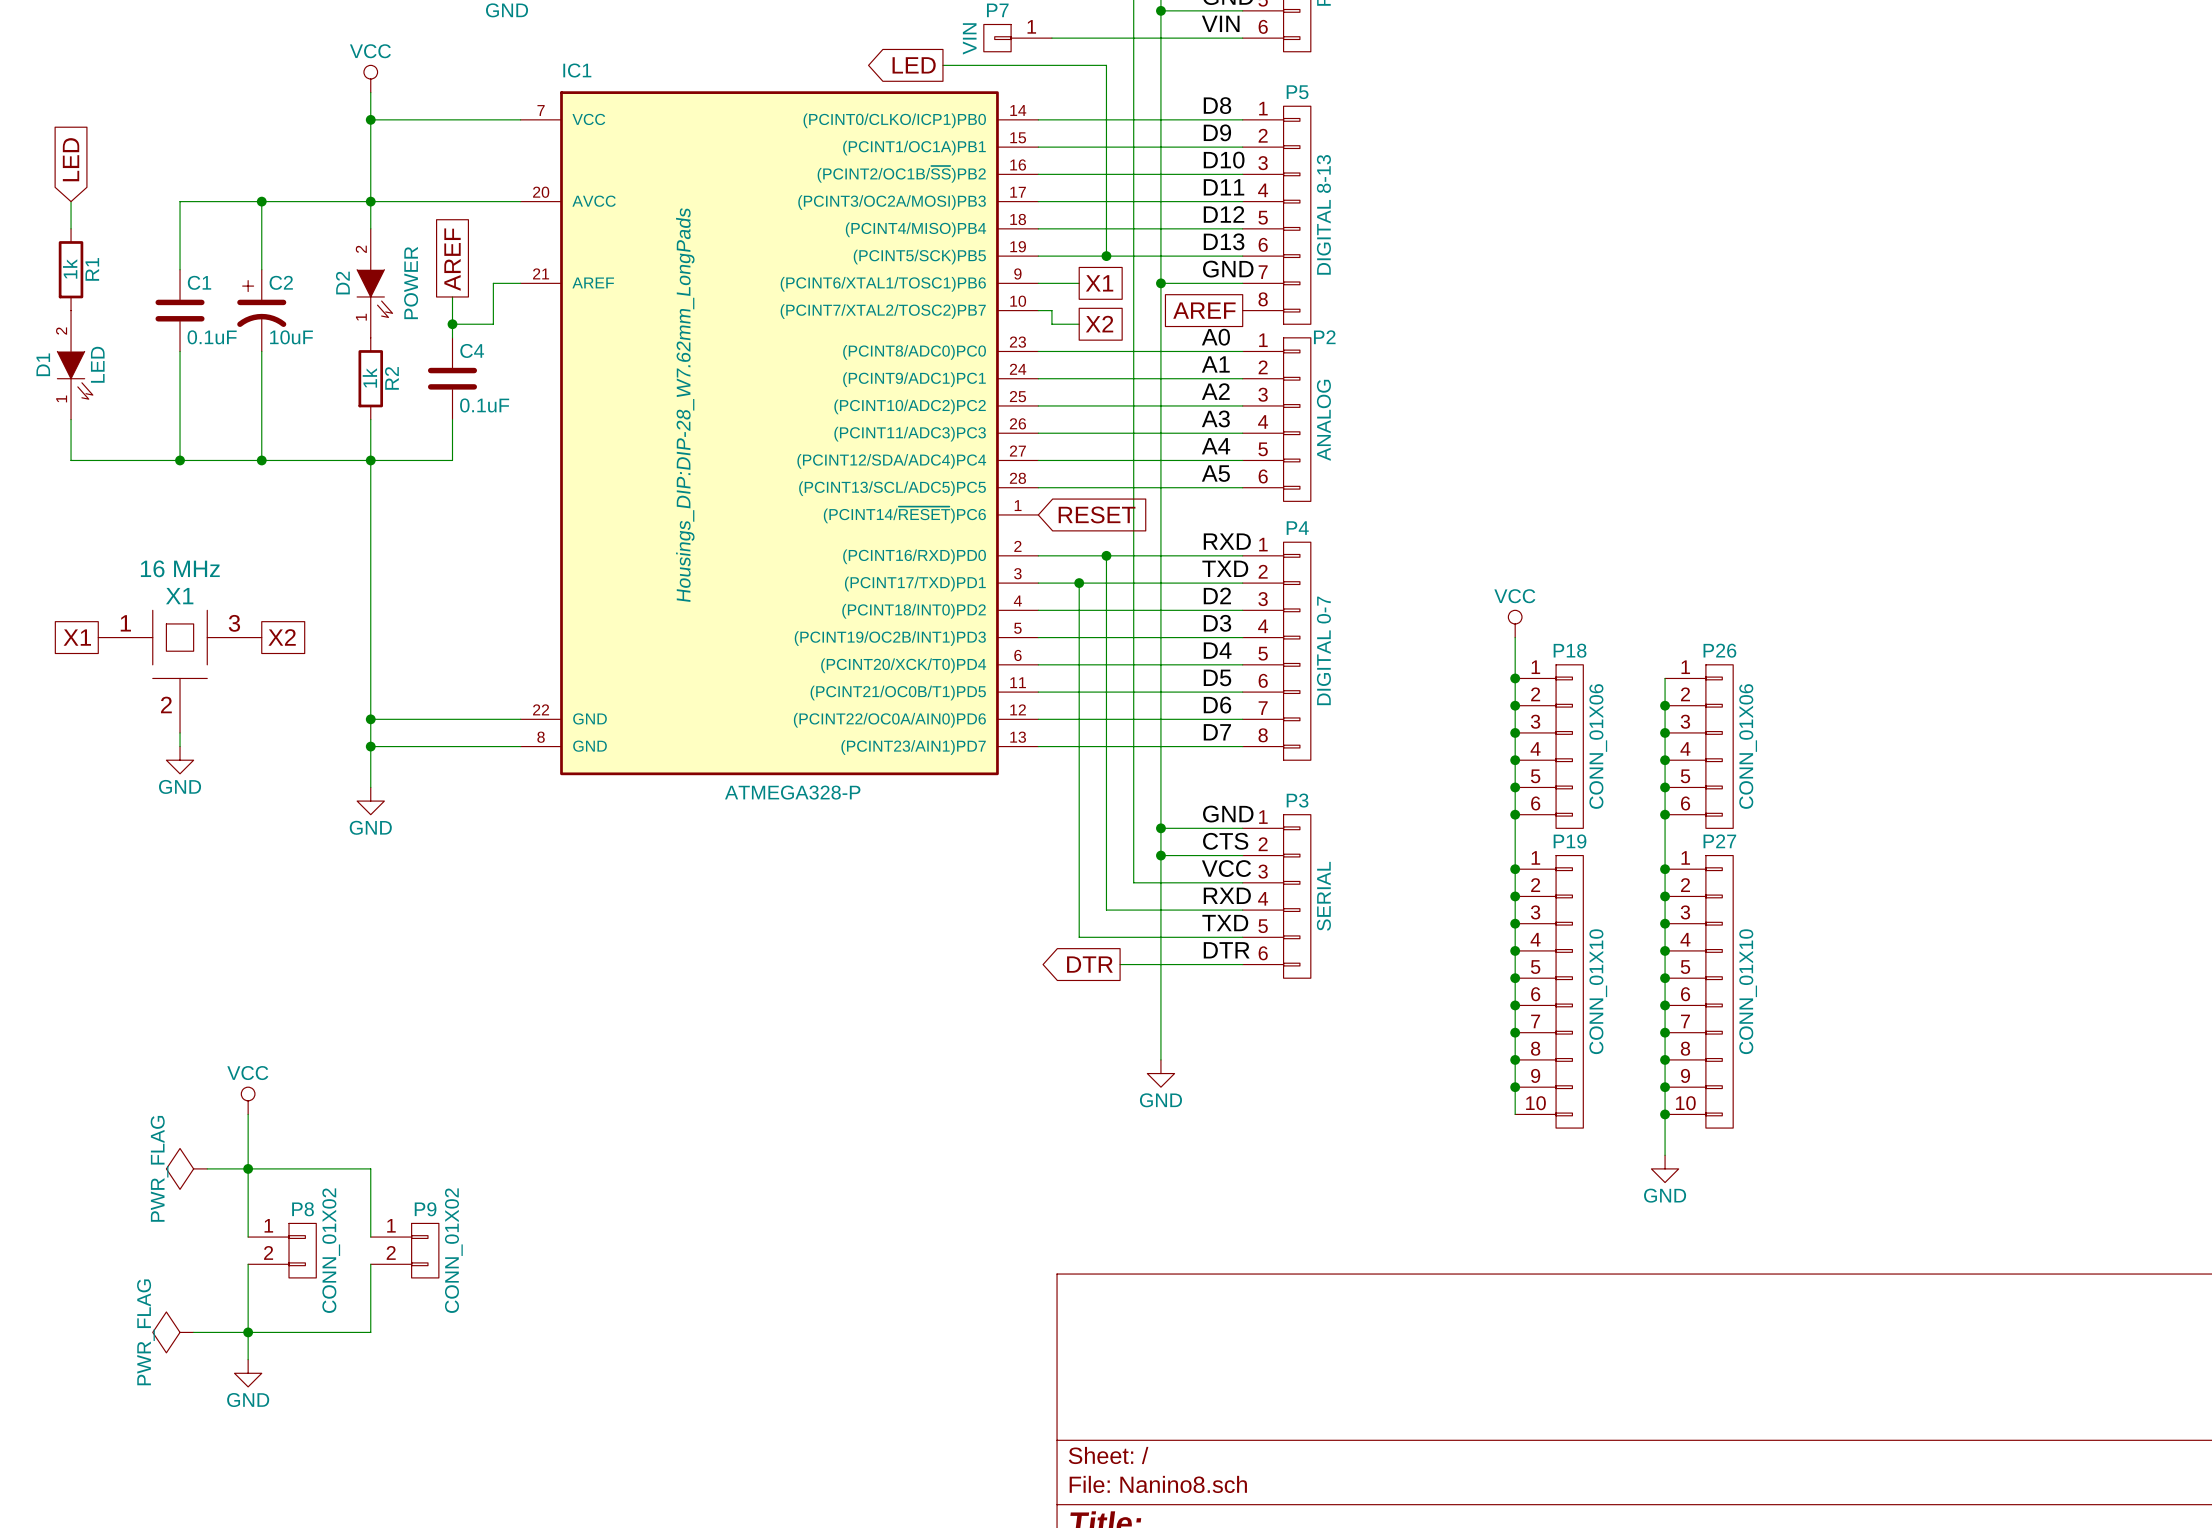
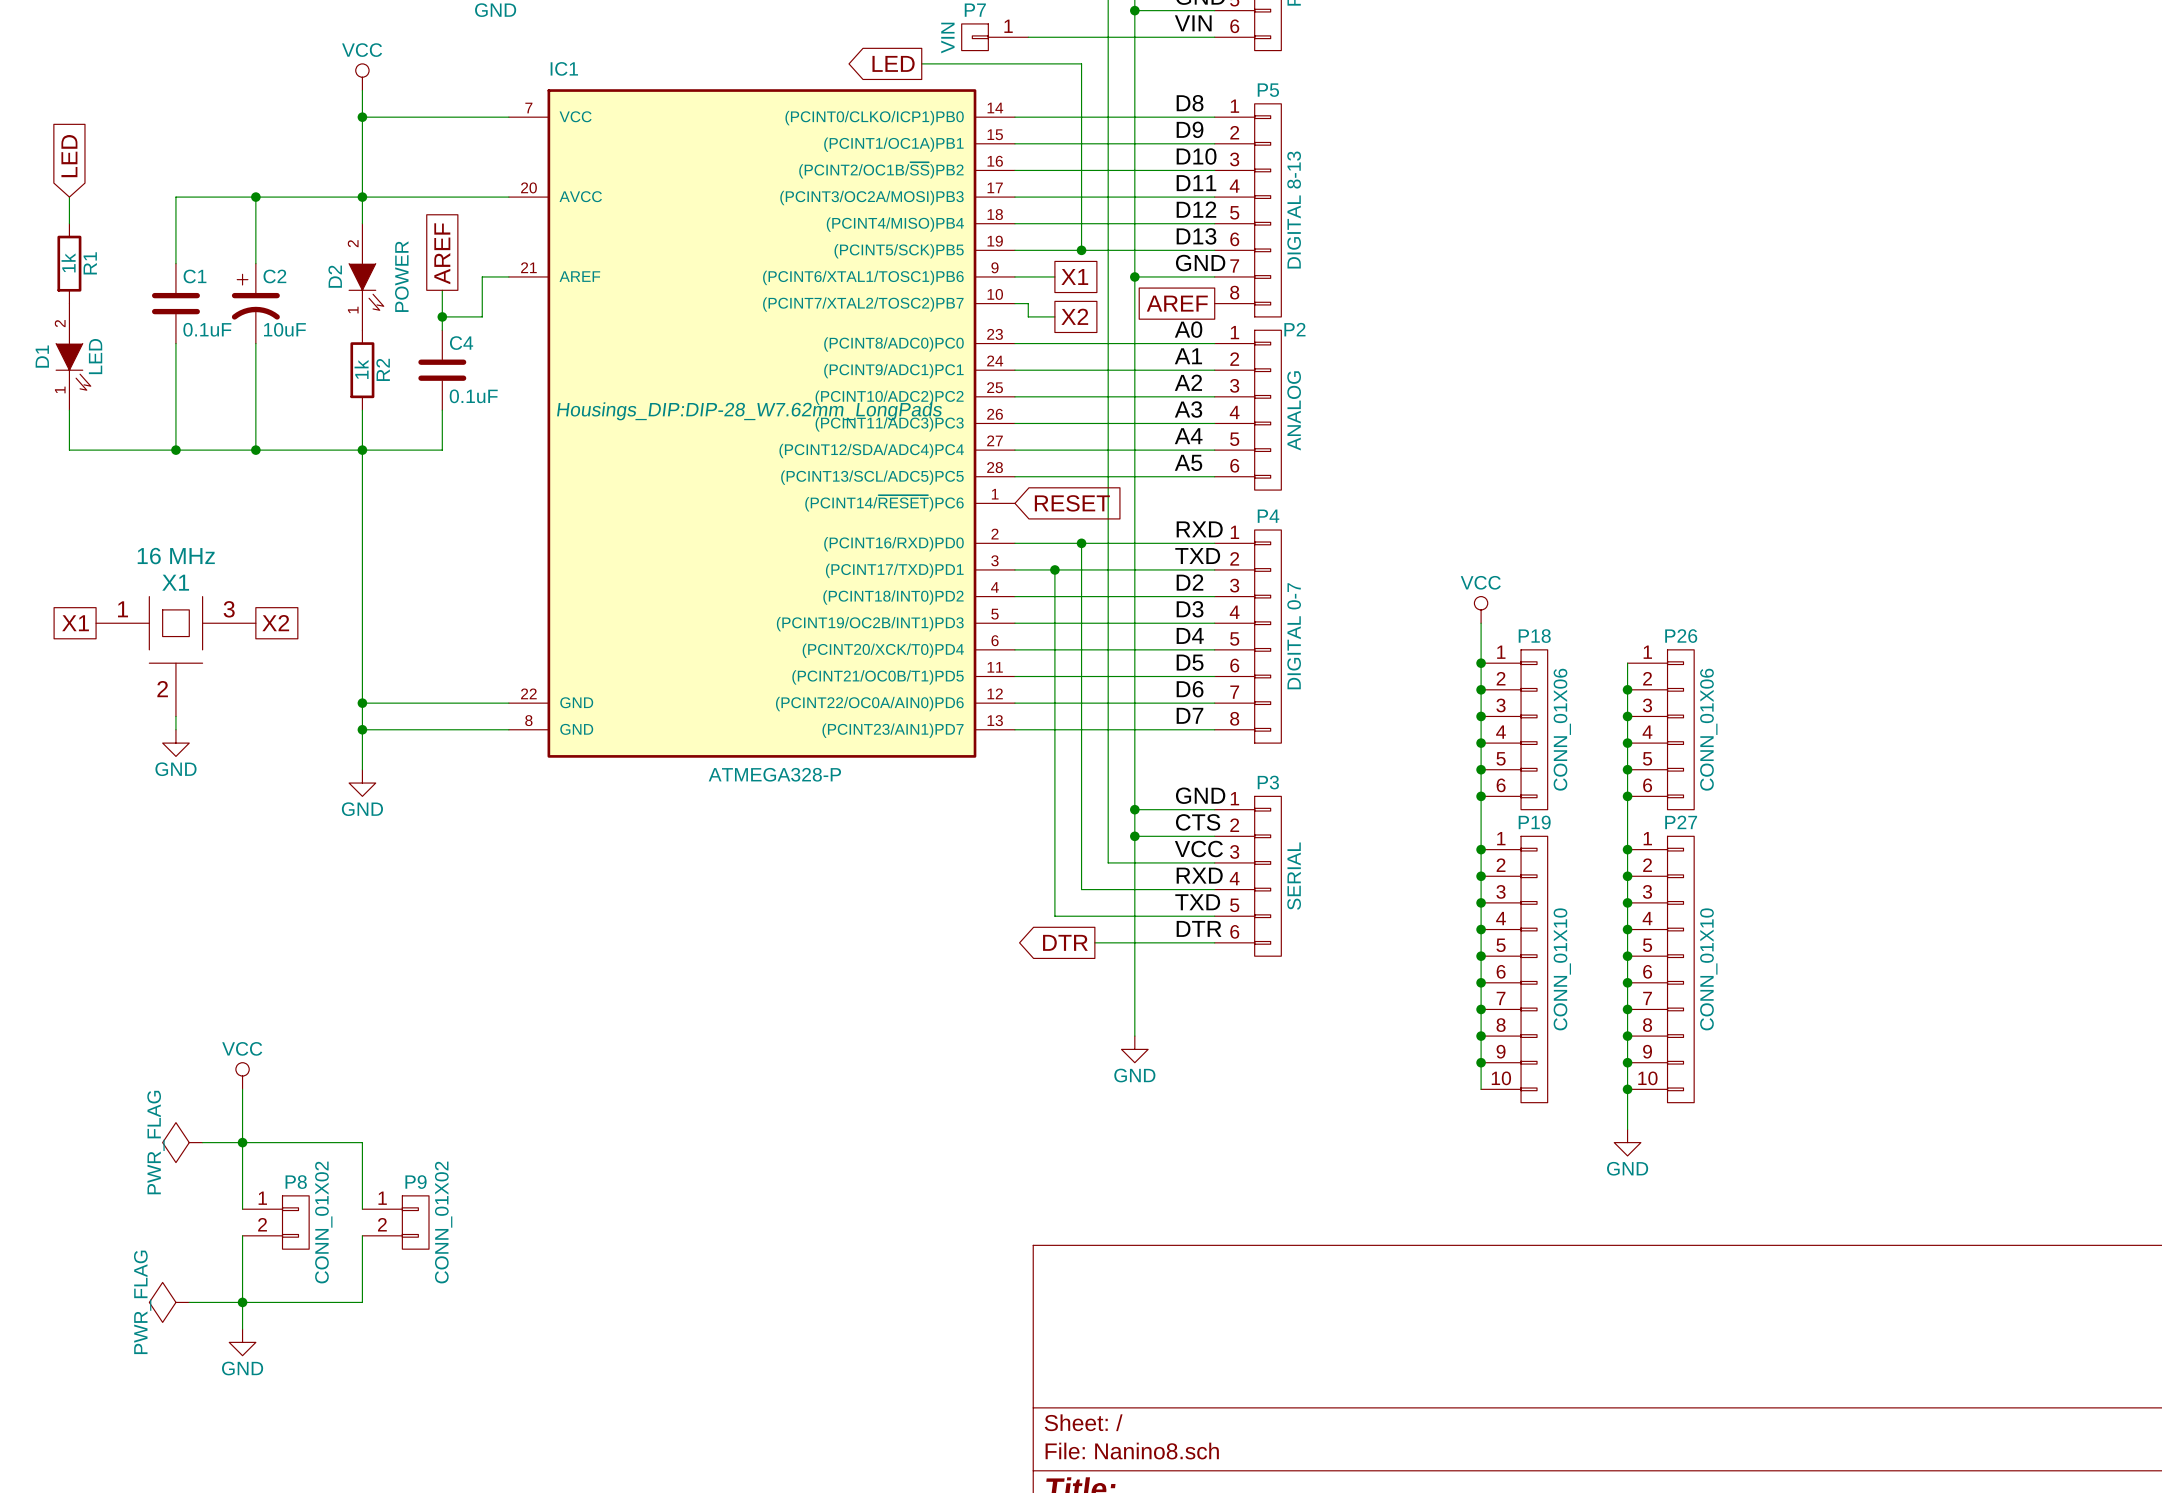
IC1 text rotation: 0° (685, 405) -> 90° clockwise (749, 411)

